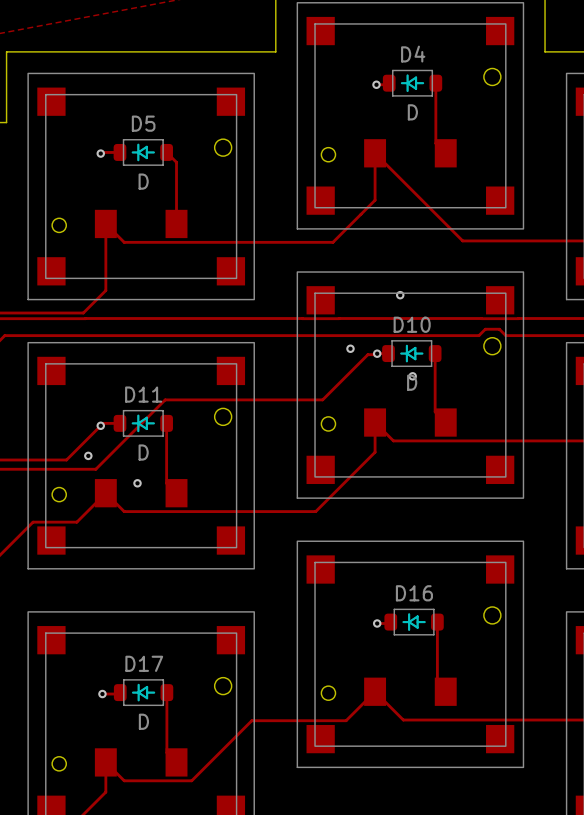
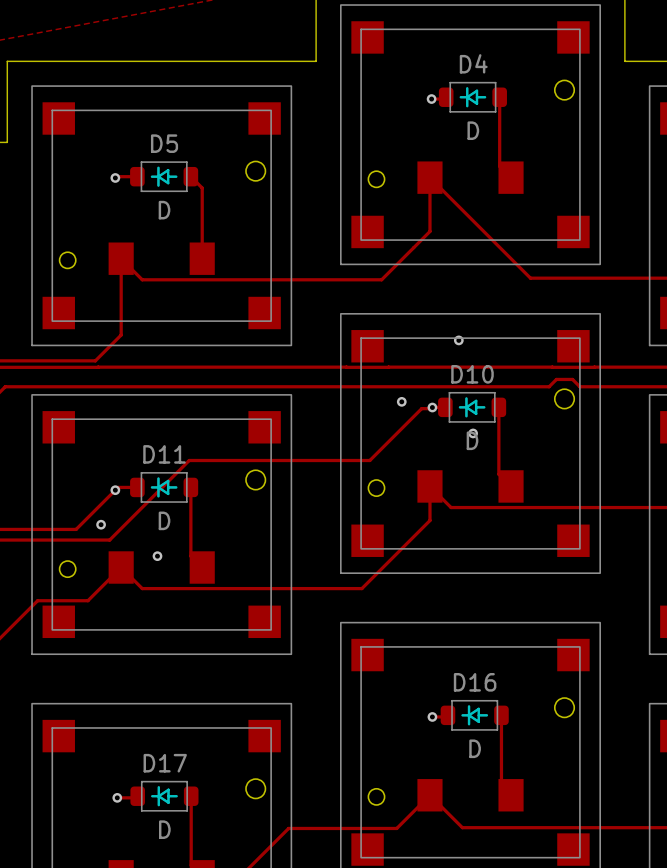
D16 value: none -> D (475, 748)

